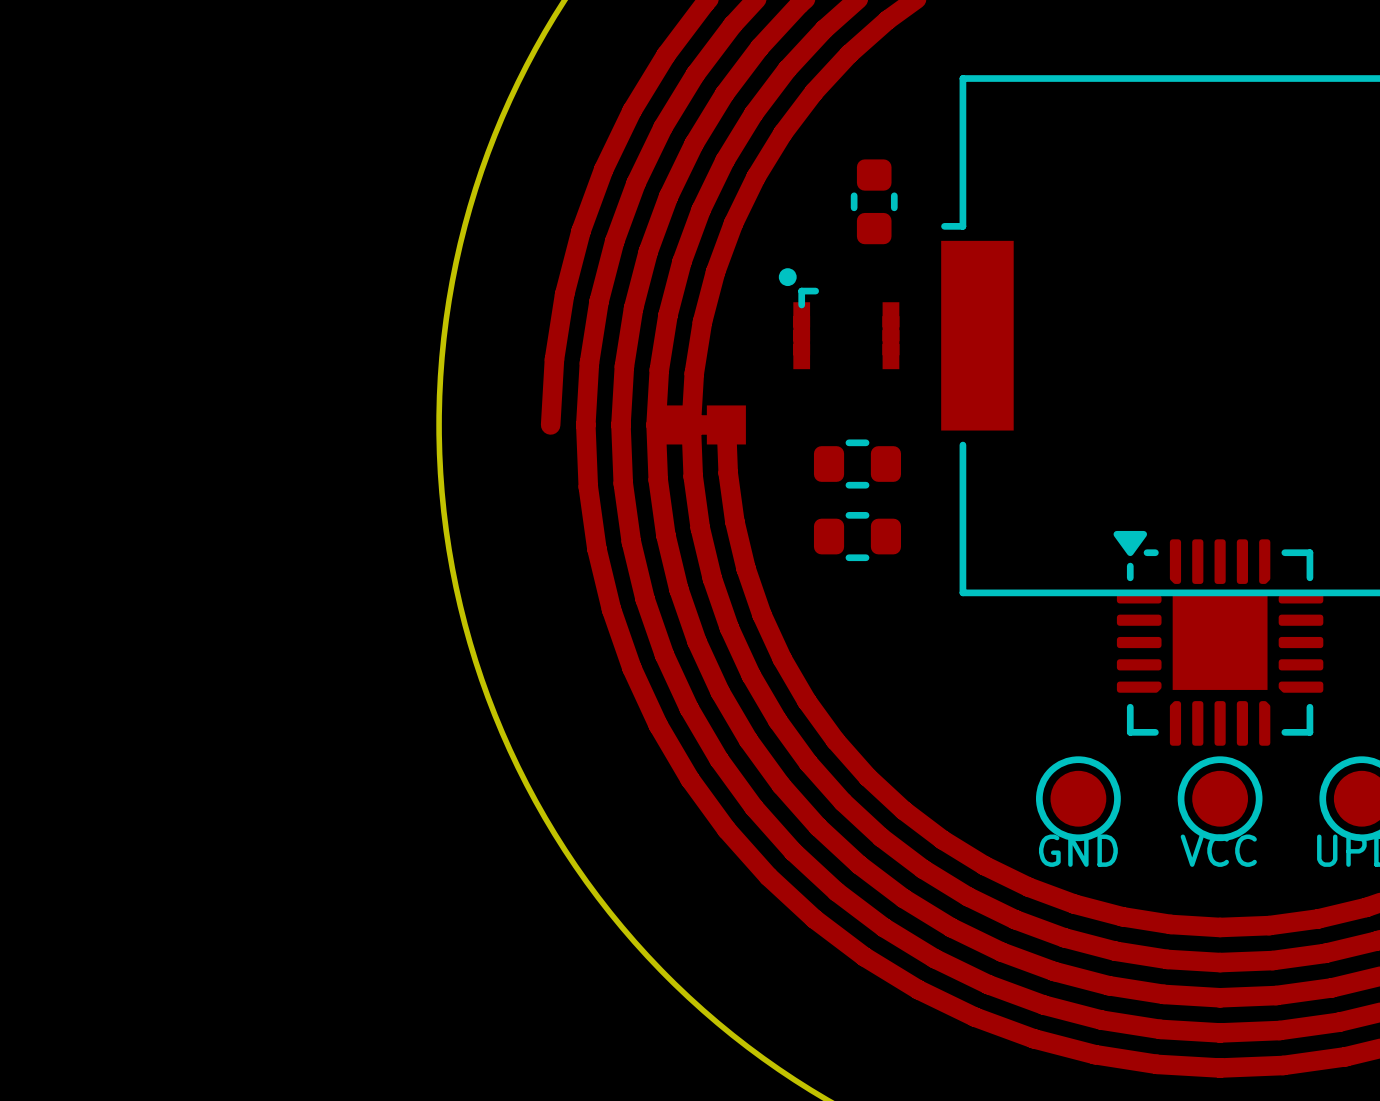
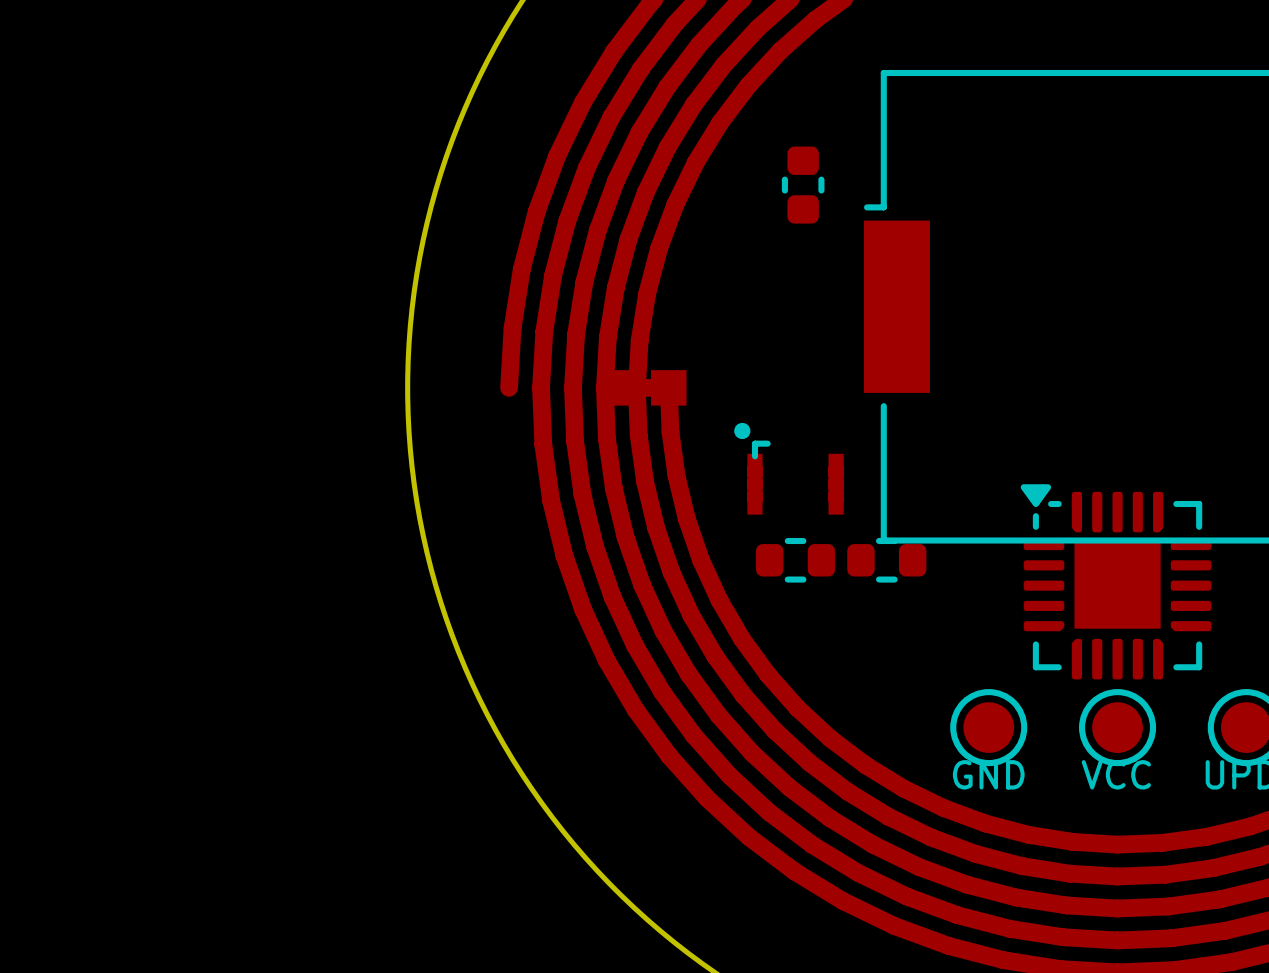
part: (839, 318) -> none
part: (857, 464) -> none
part footprint: [813, 511, 902, 562] -> [734, 422, 844, 515]
part: none -> (795, 560)
part: none -> (886, 560)

